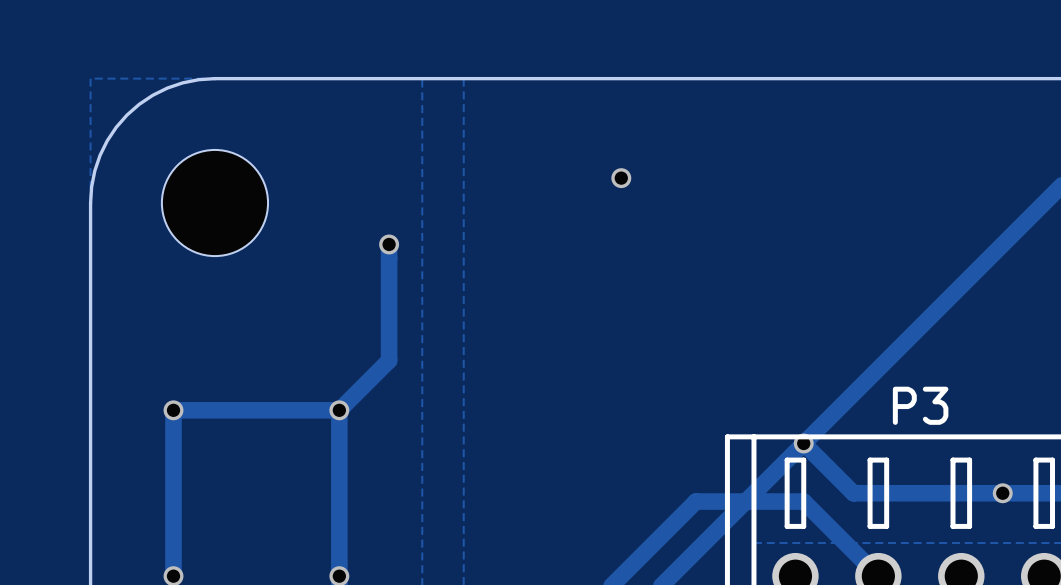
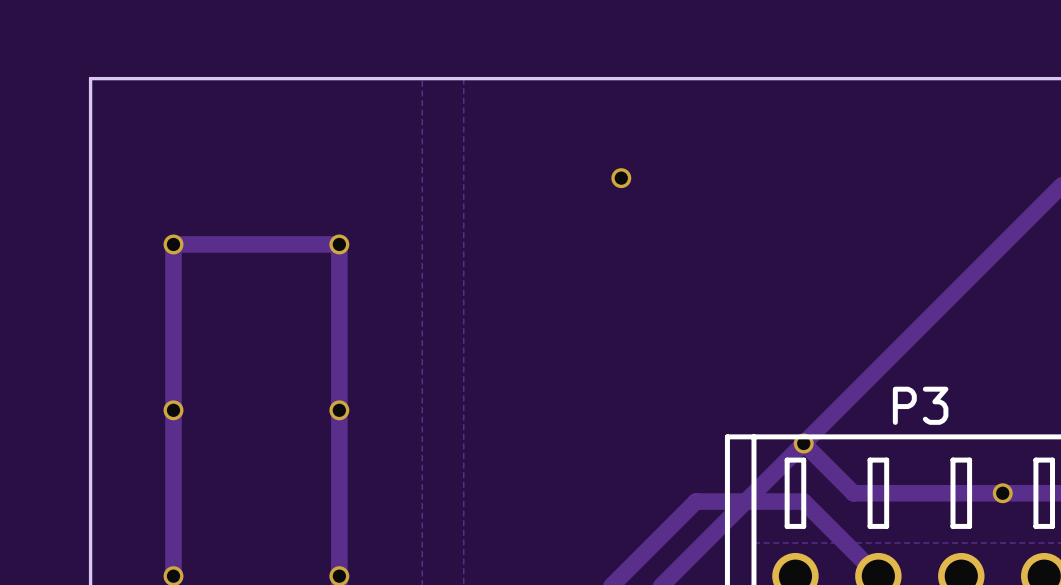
board edge: (214, 78) (198, 79) (167, 88) (139, 104) (127, 115) (116, 127) (100, 155) (94, 170) (90, 203) -> (214, 78) (90, 78) (90, 203)
part: (214, 203) -> none
via: none -> (173, 244)
track: (389, 244) (389, 360) (339, 410) (173, 410) -> (339, 410) (339, 244) (173, 244) (173, 410)
via position: (389, 244) -> (339, 244)

